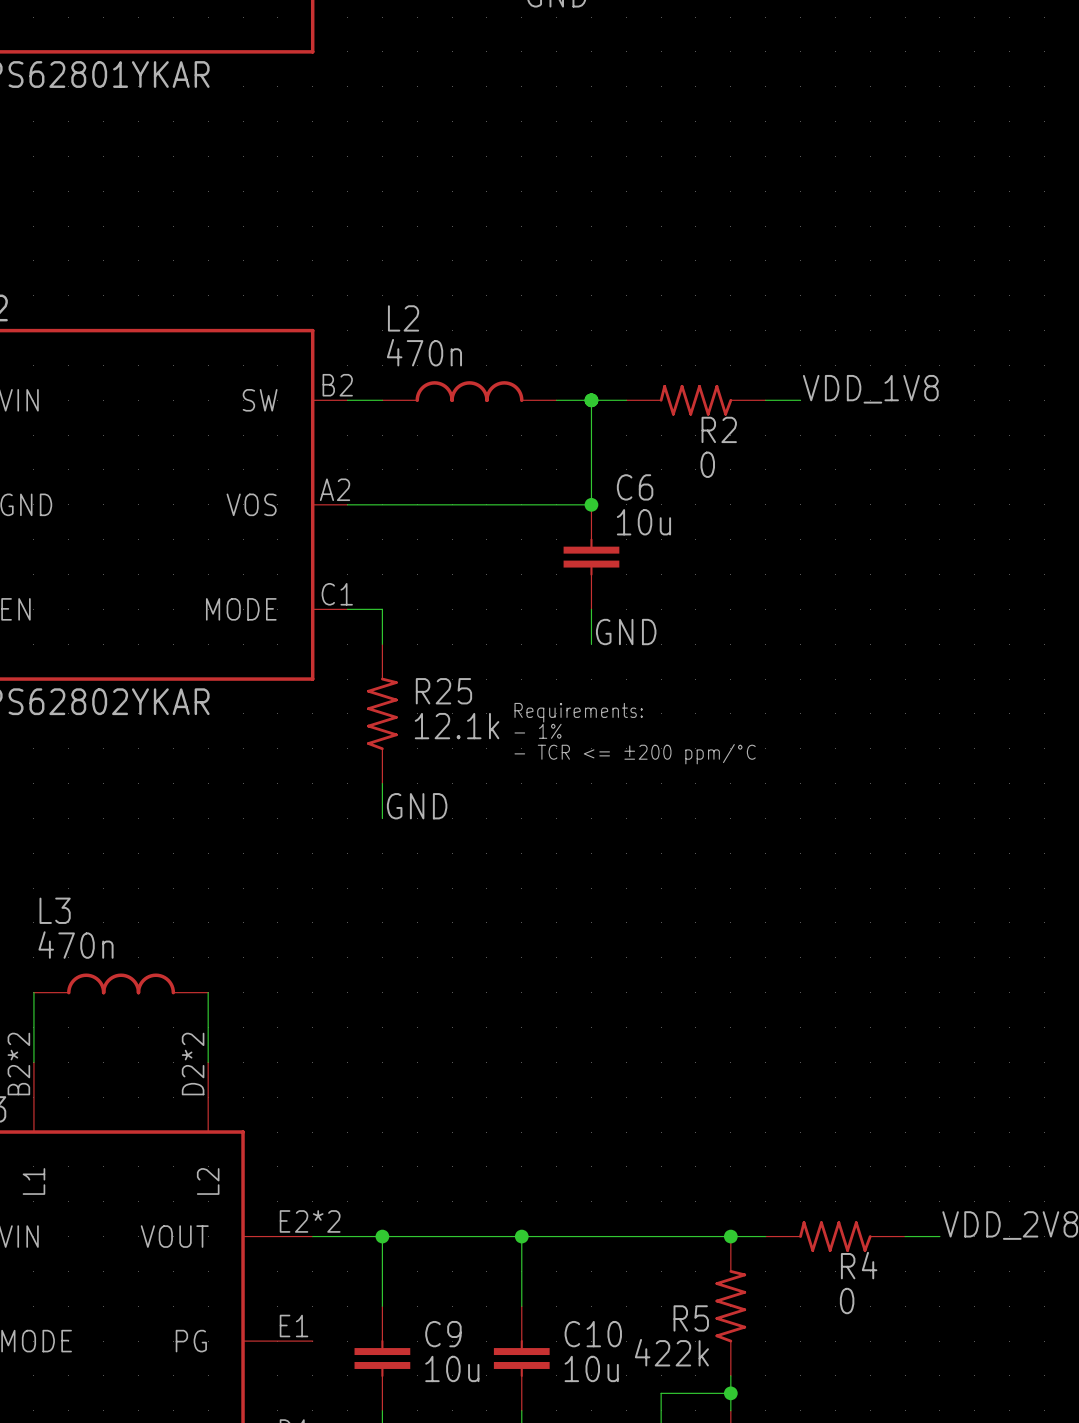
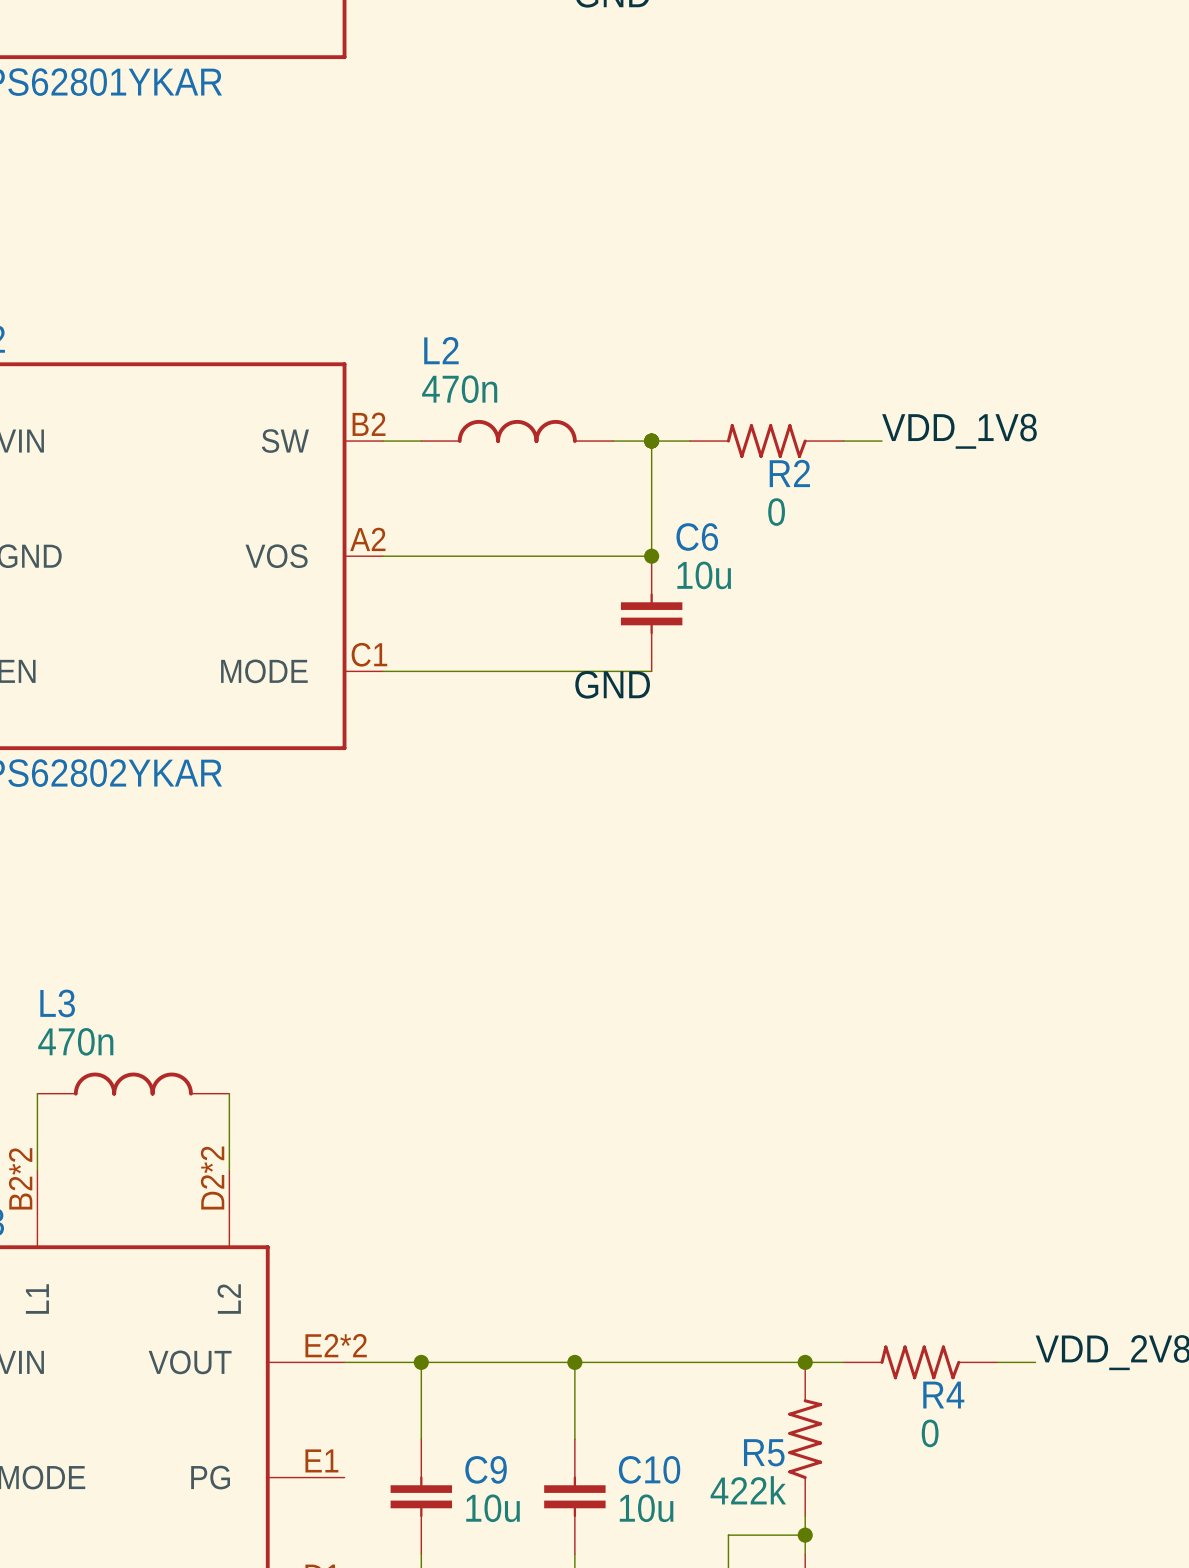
wire: (382, 609) (382, 644) -> (421, 671) (651, 671)
wire: (591, 609) (591, 644) -> none
label position: GND (626, 632) -> GND (612, 684)
text: Requirements: (578, 712) -> none
R25: 12.1k (382, 713) -> none
text: - 1% (538, 731) -> none
text: - TCR <= ±200 ppm/°C (635, 754) -> none
wire: (382, 783) (382, 818) -> none
label: GND (417, 806) -> none

